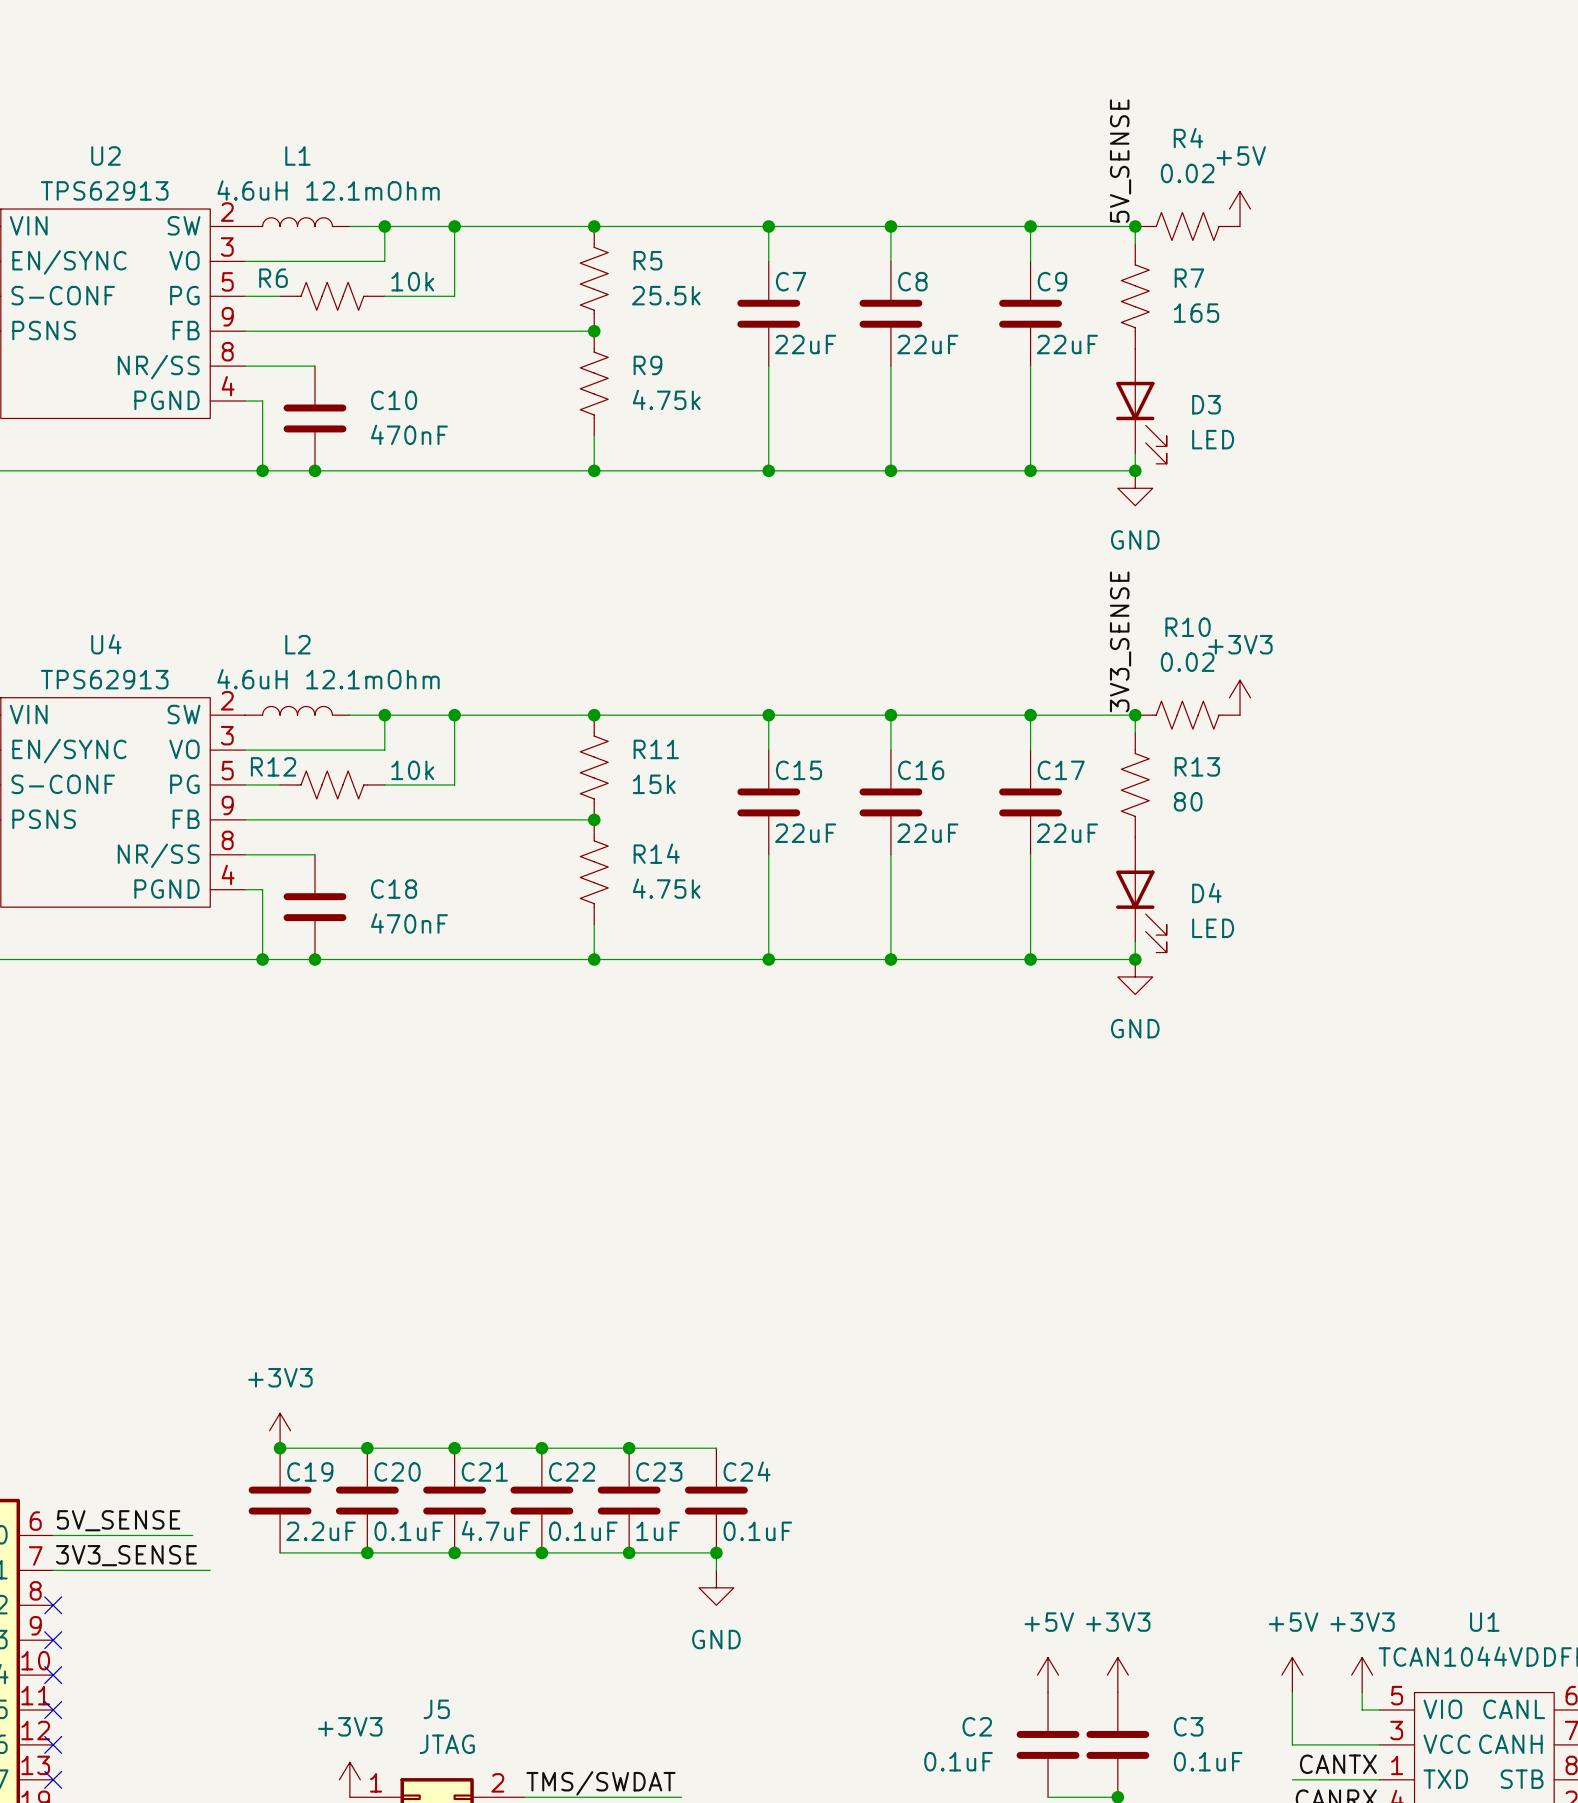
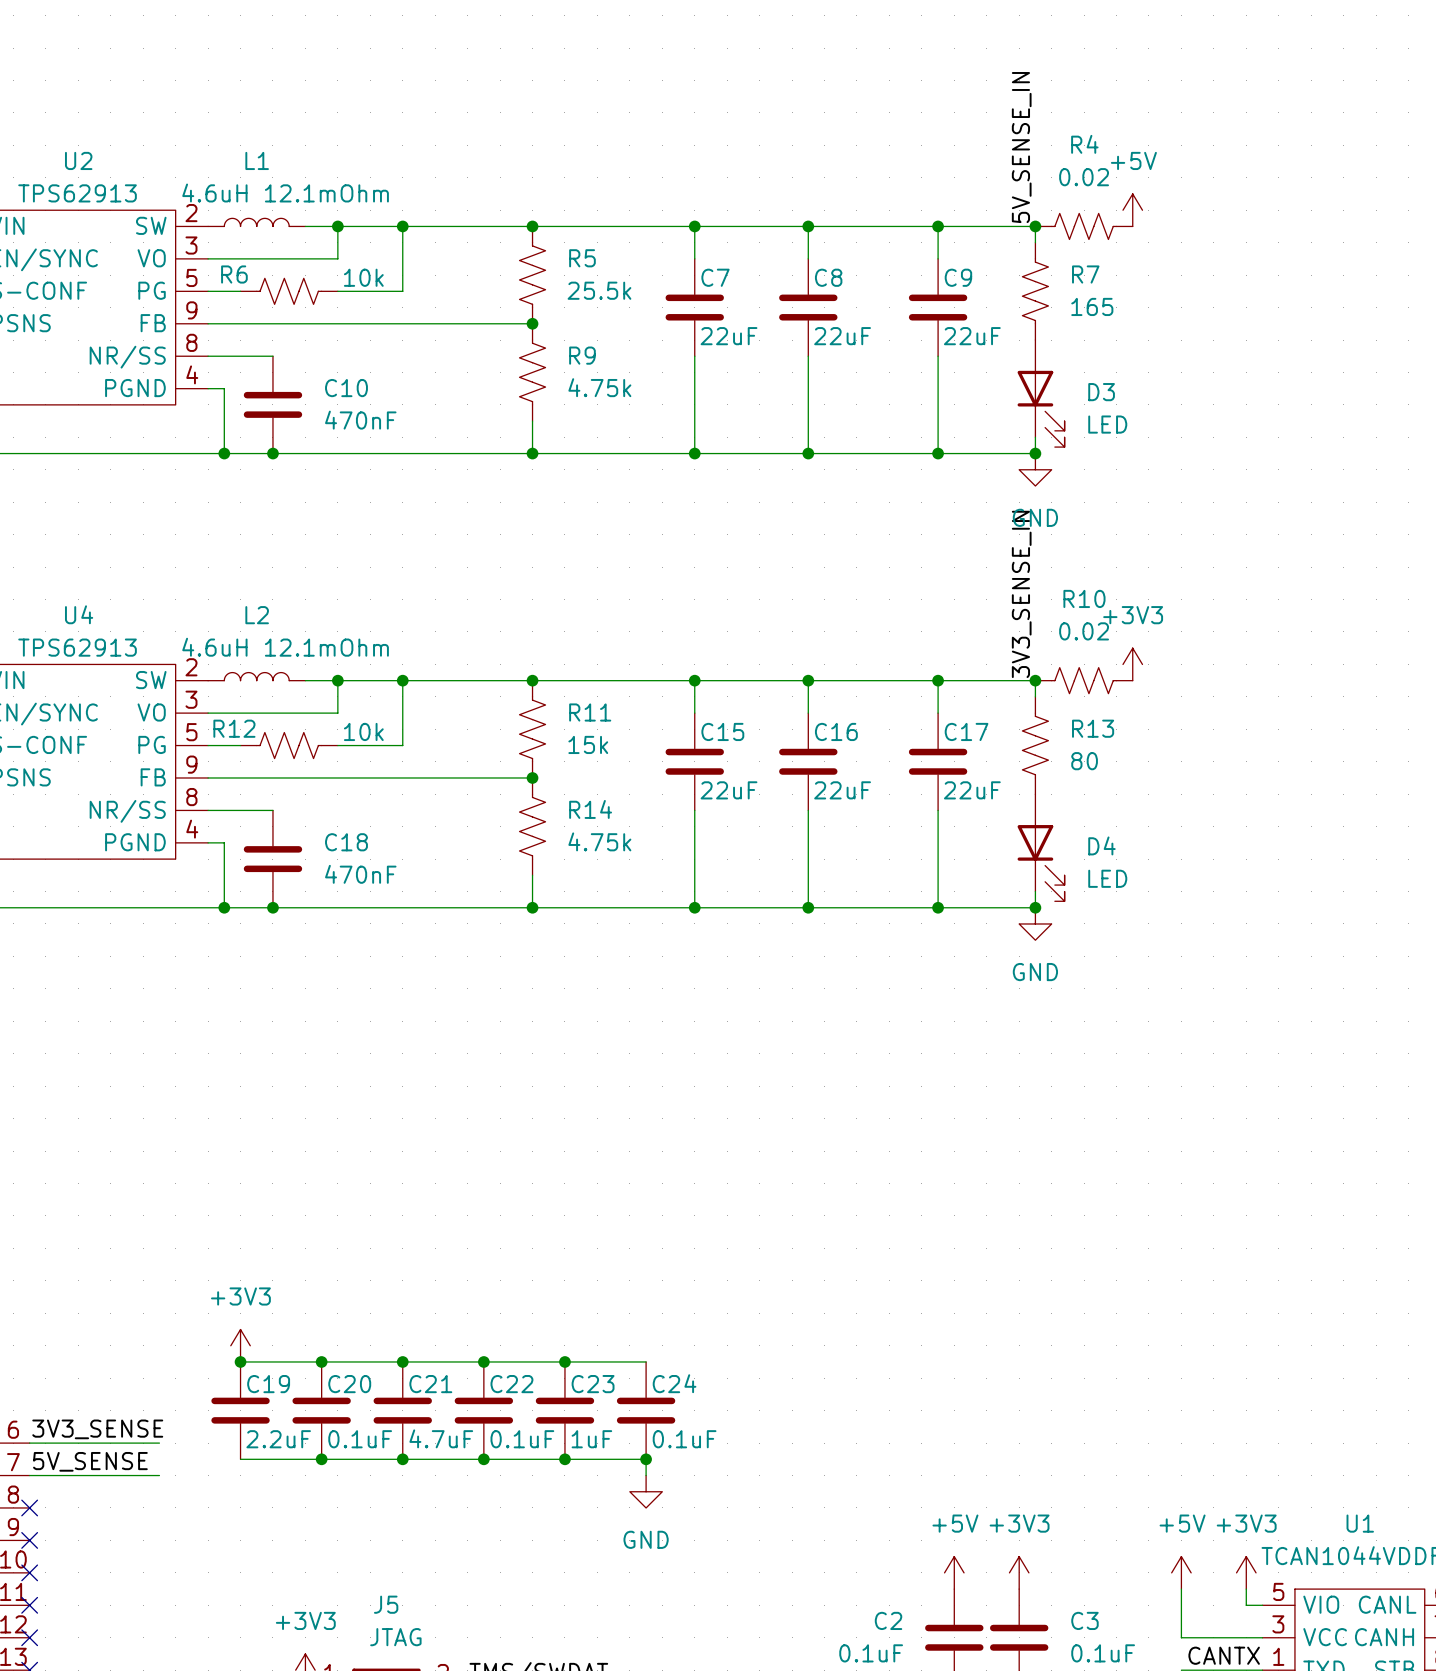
label: 5V_SENSE (1120, 161) -> 5V_SENSE_IN (1021, 147)
label: 3V3_SENSE (1120, 641) -> 3V3_SENSE_IN (1021, 594)
label: 5V_SENSE (118, 1520) -> 3V3_SENSE (97, 1429)
label: 3V3_SENSE (126, 1555) -> 5V_SENSE (90, 1461)
wire: (192, 1570) (210, 1570) -> none

